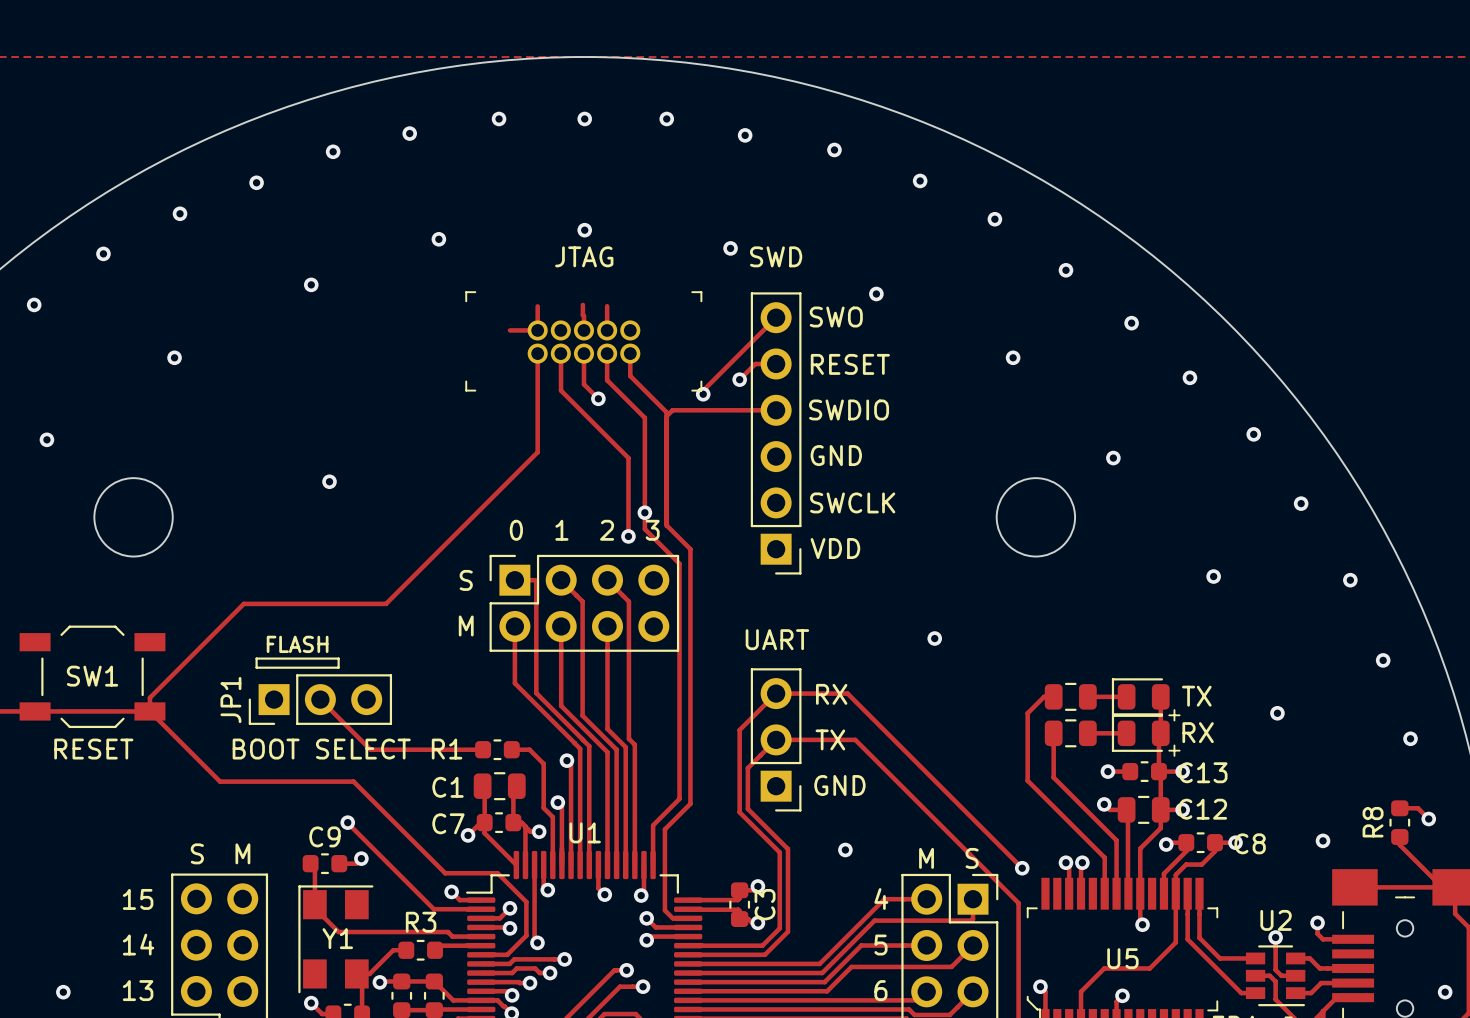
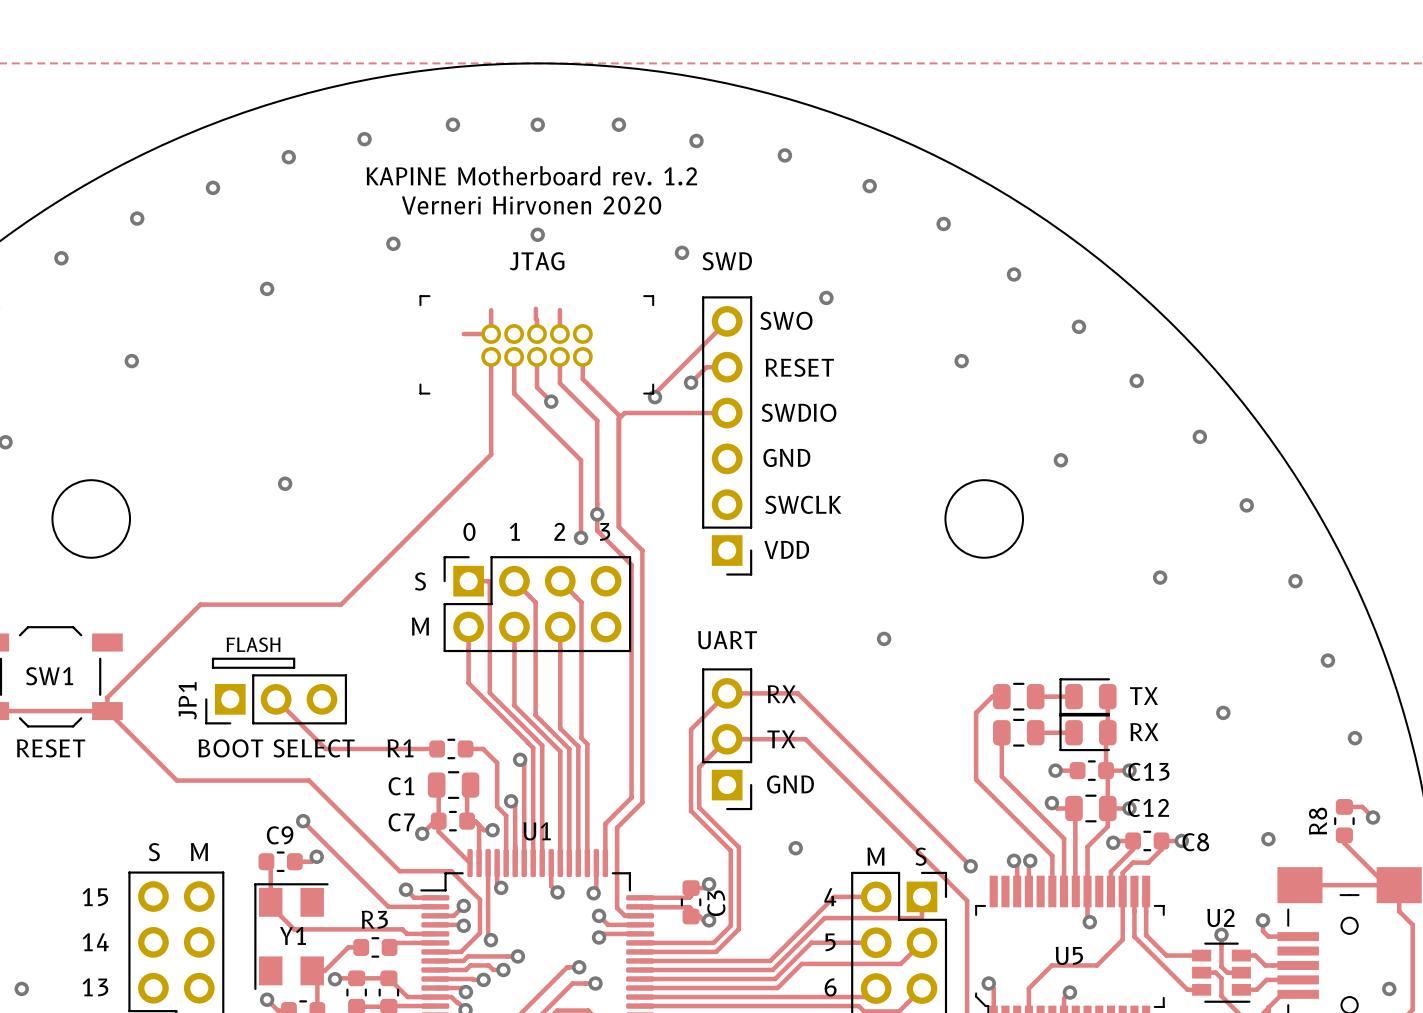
text: none -> KAPINE Motherboard rev. 1.2 (531, 175)
text: none -> Verneri Hirvonen 2020 (531, 205)
text: + (1174, 715) -> none
text: + (1174, 750) -> none

